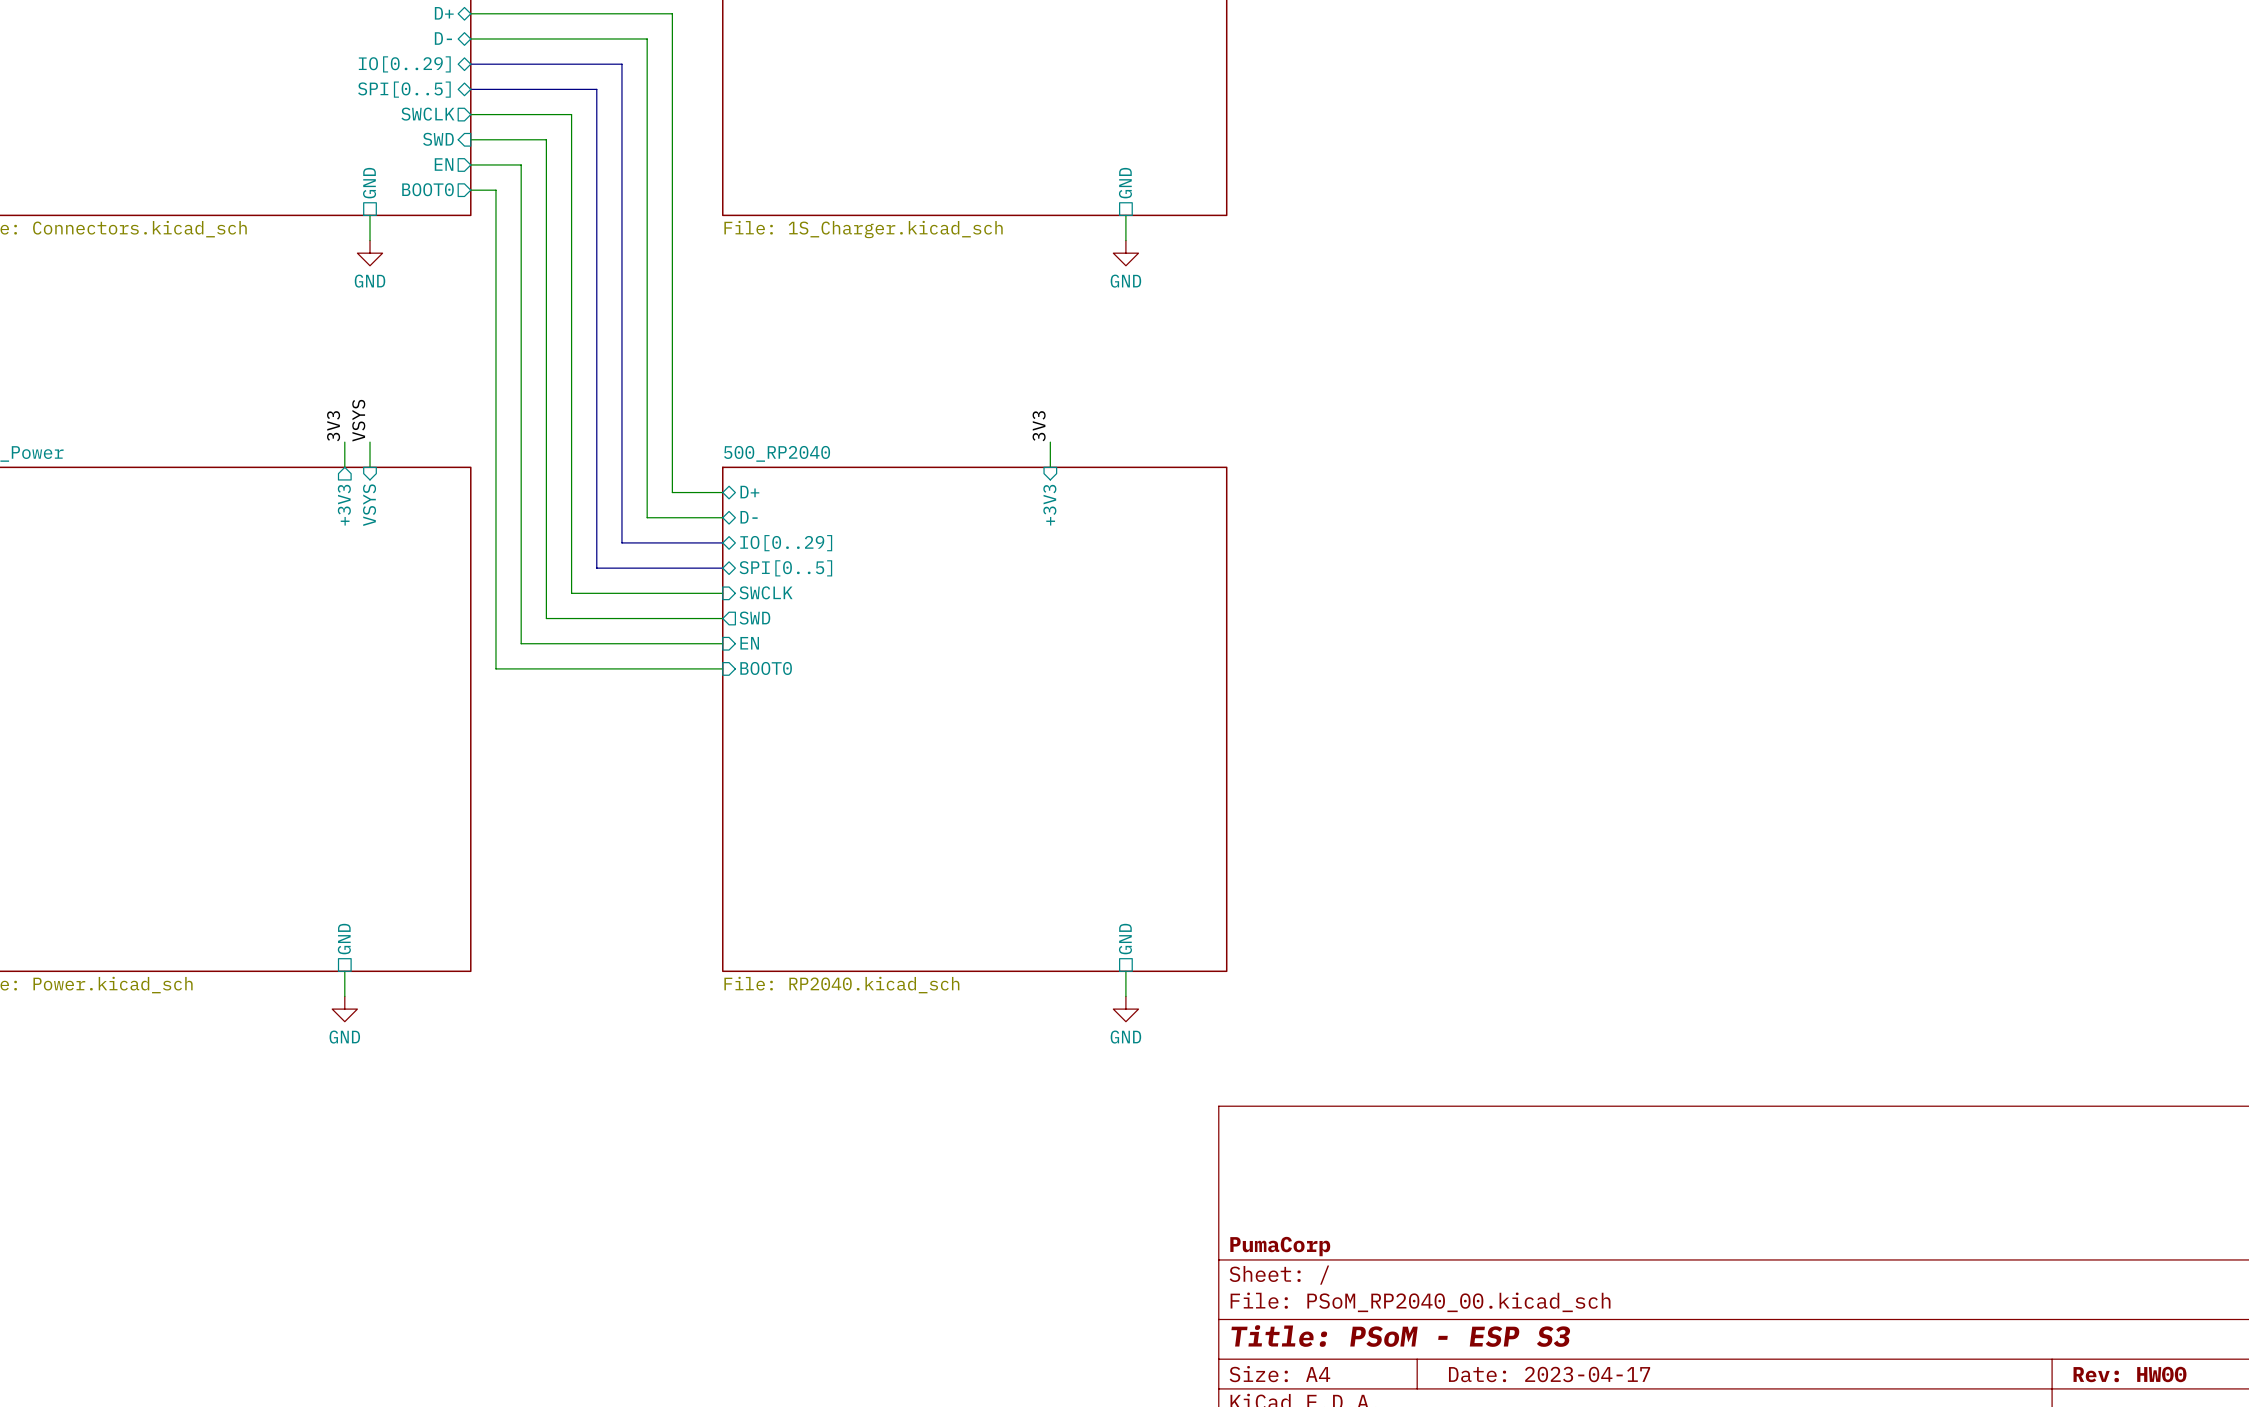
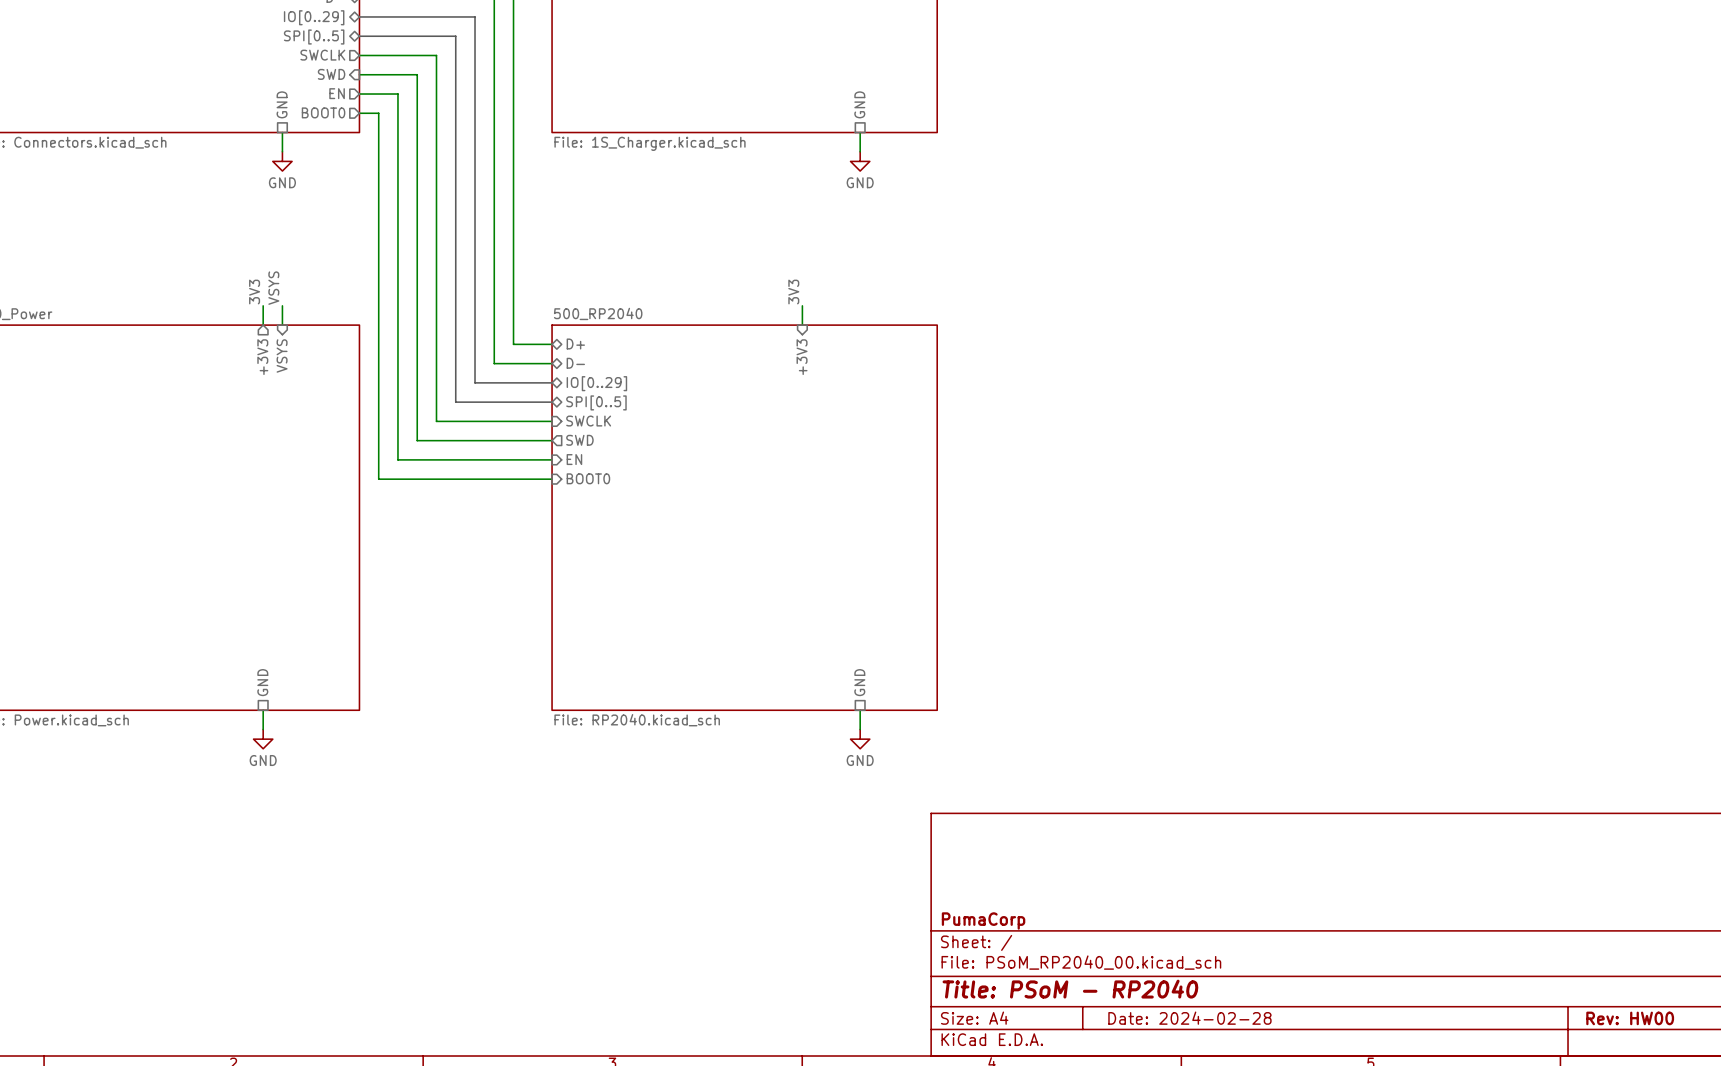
title block: Title: PSoM - ESP S3 (1400, 1336) -> Title: PSoM - RP2040 (1070, 989)
title block: Date: 2023-04-17 (1549, 1374) -> Date: 2024-02-28 (1189, 1018)

